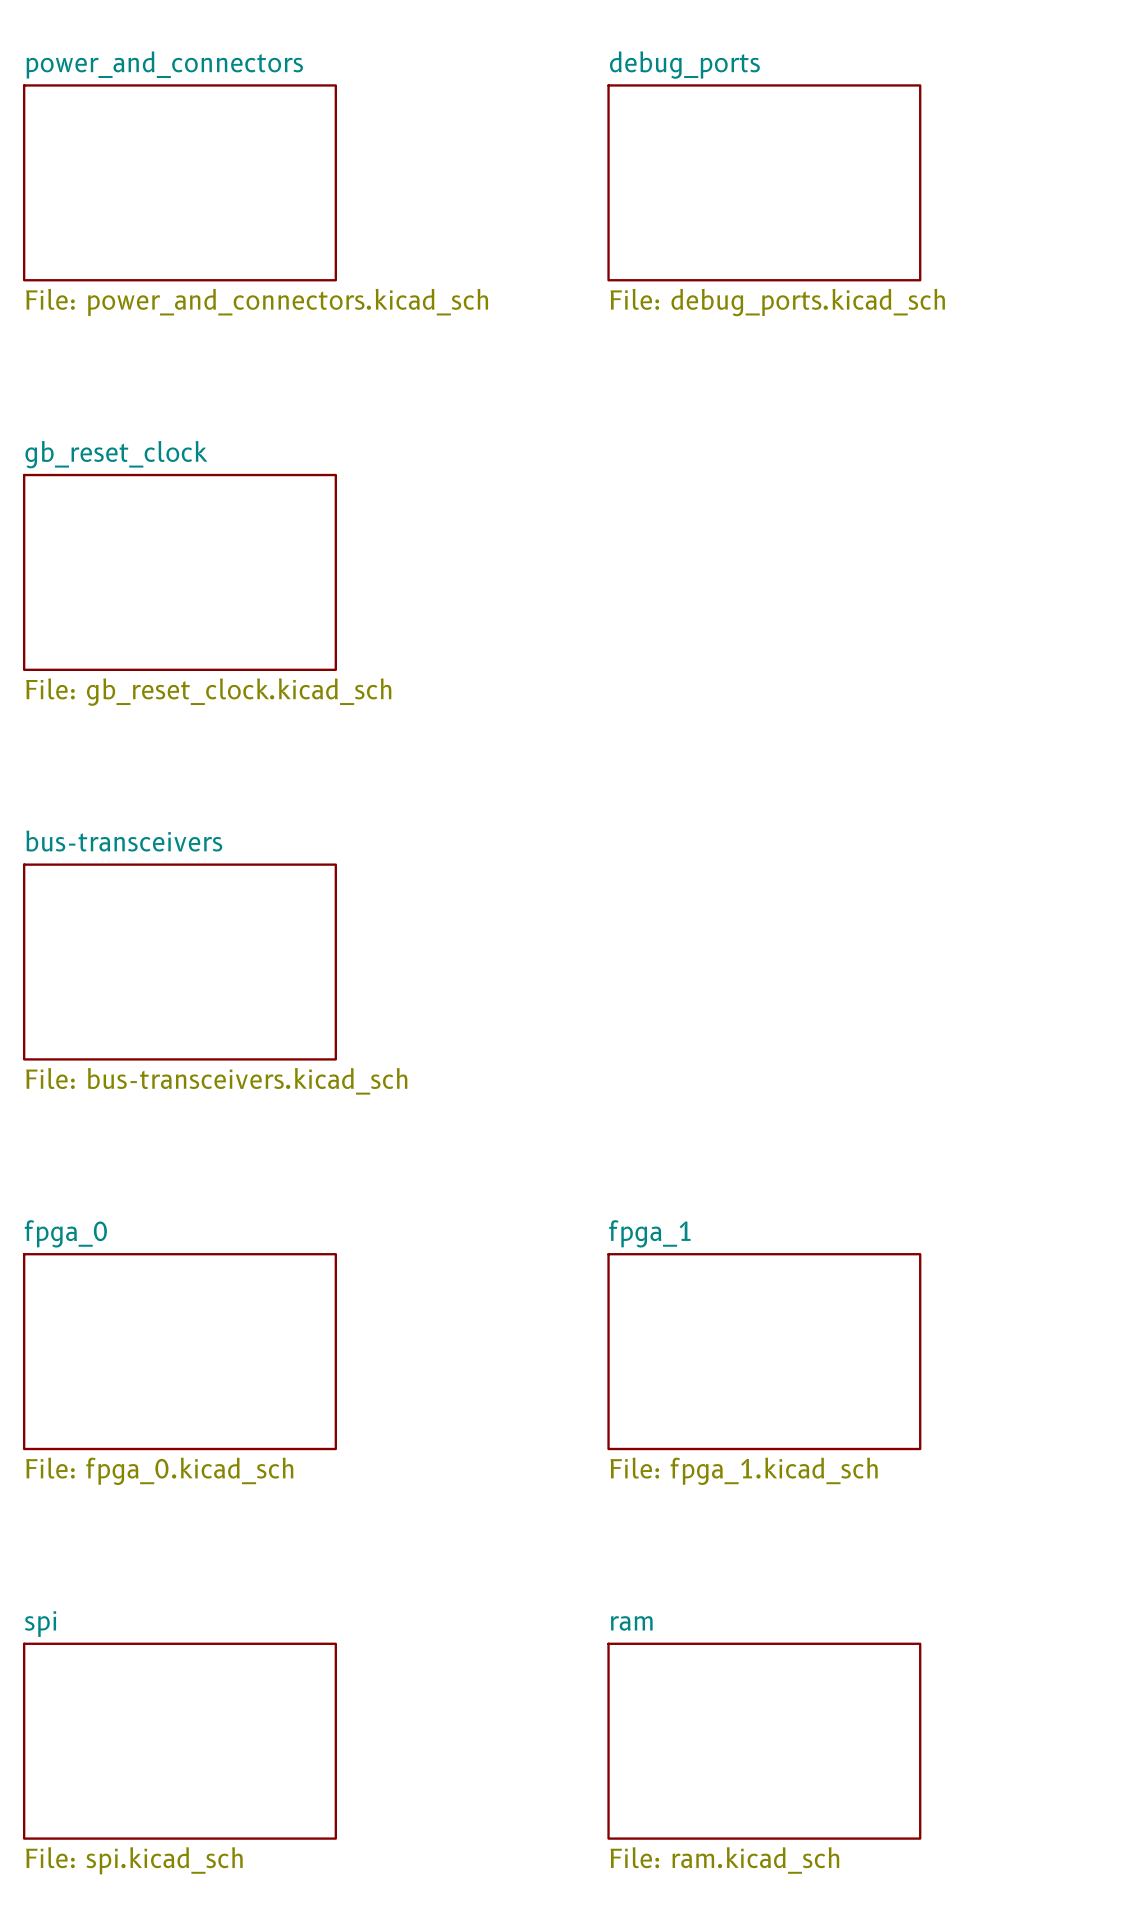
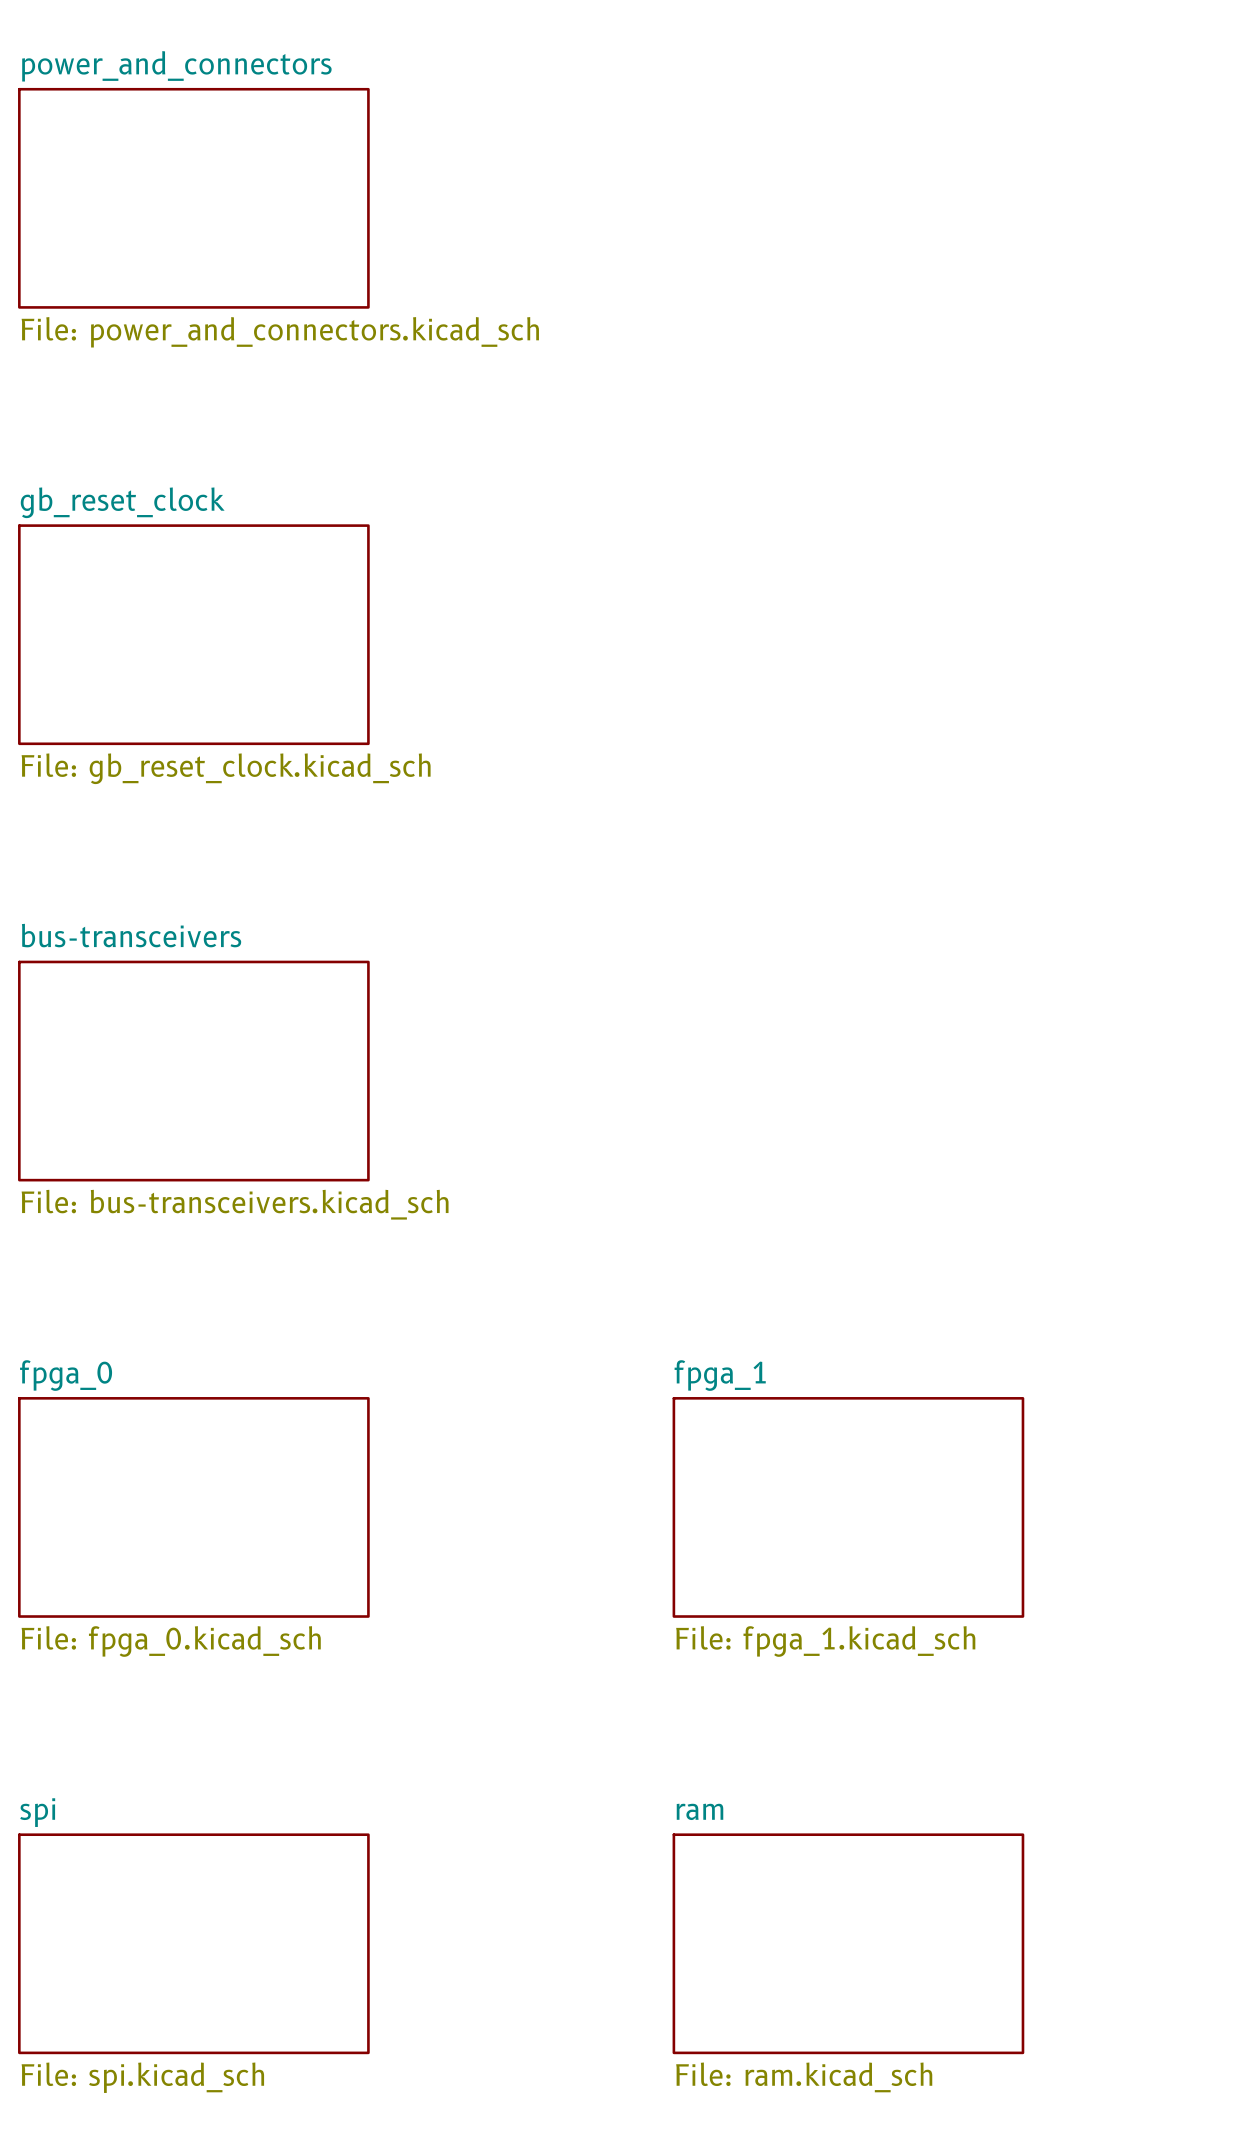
sheet debug_ports: File: debug_ports.kicad_sch (764, 182) -> none

